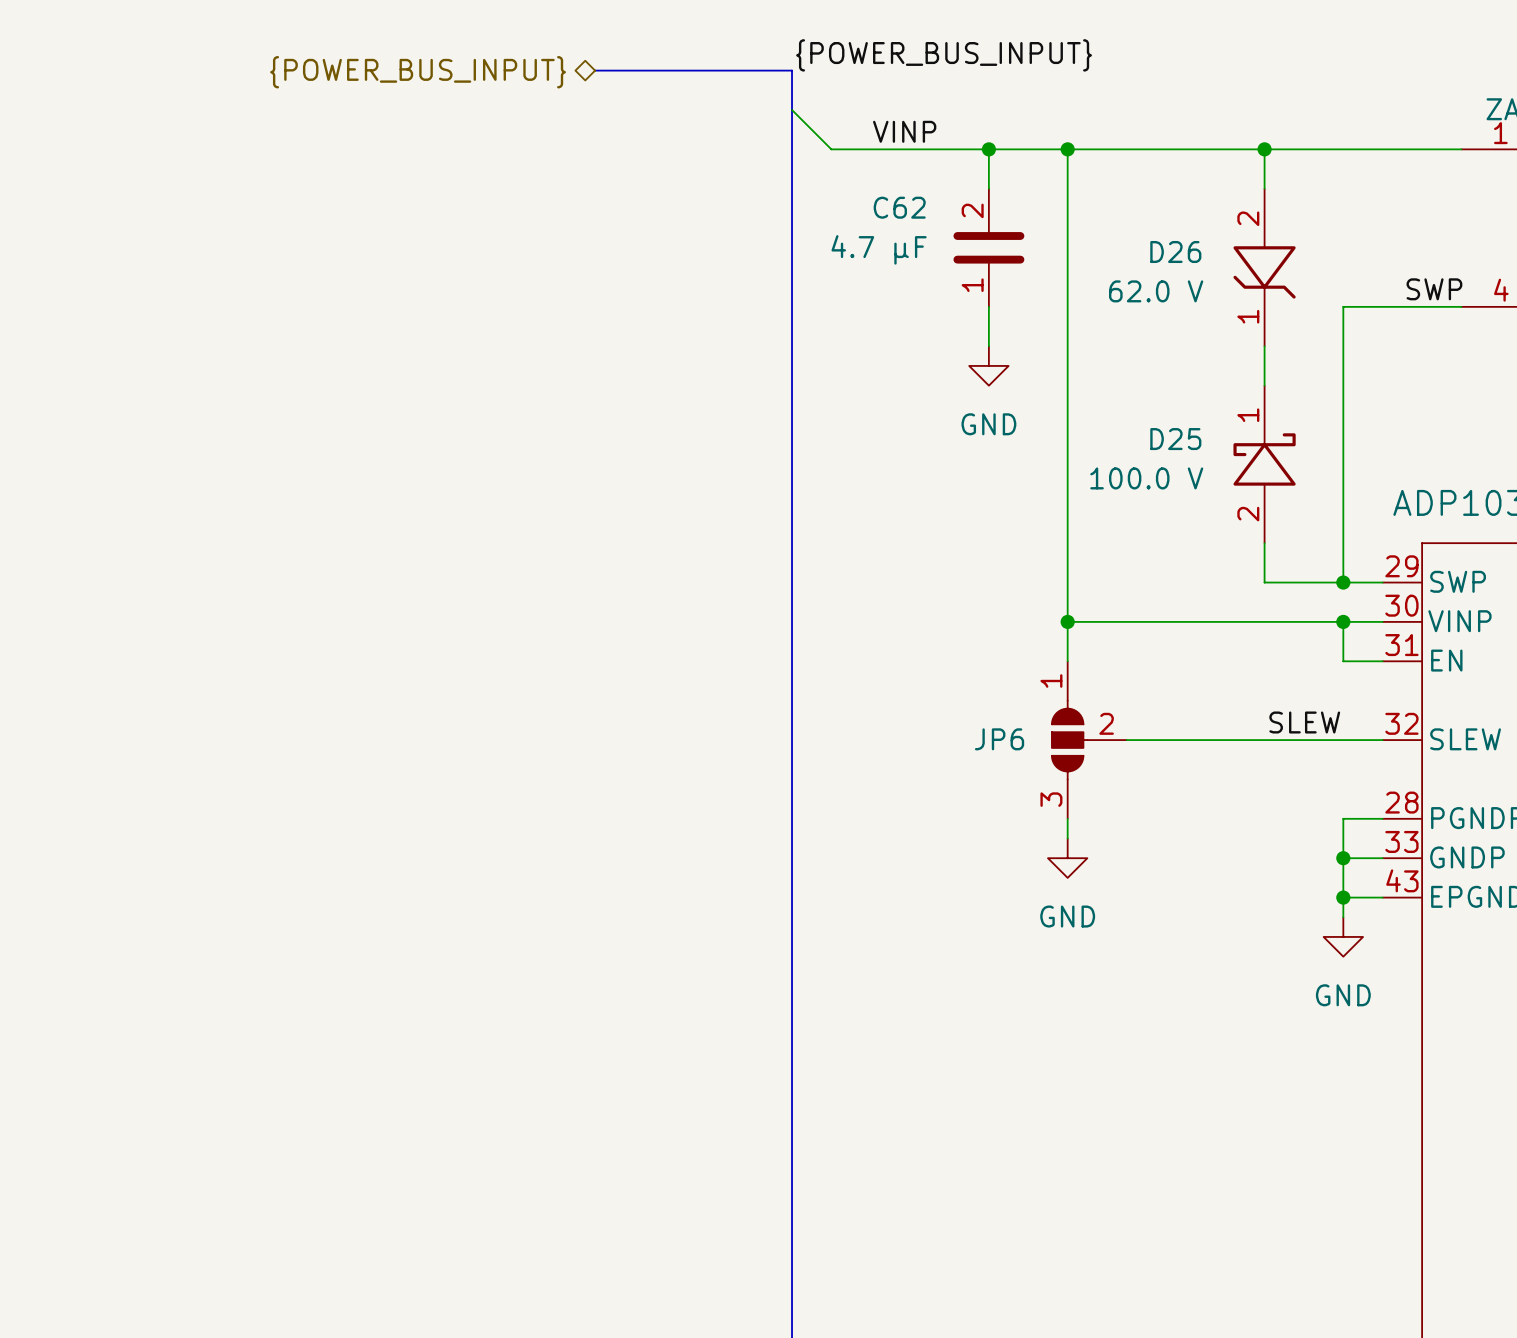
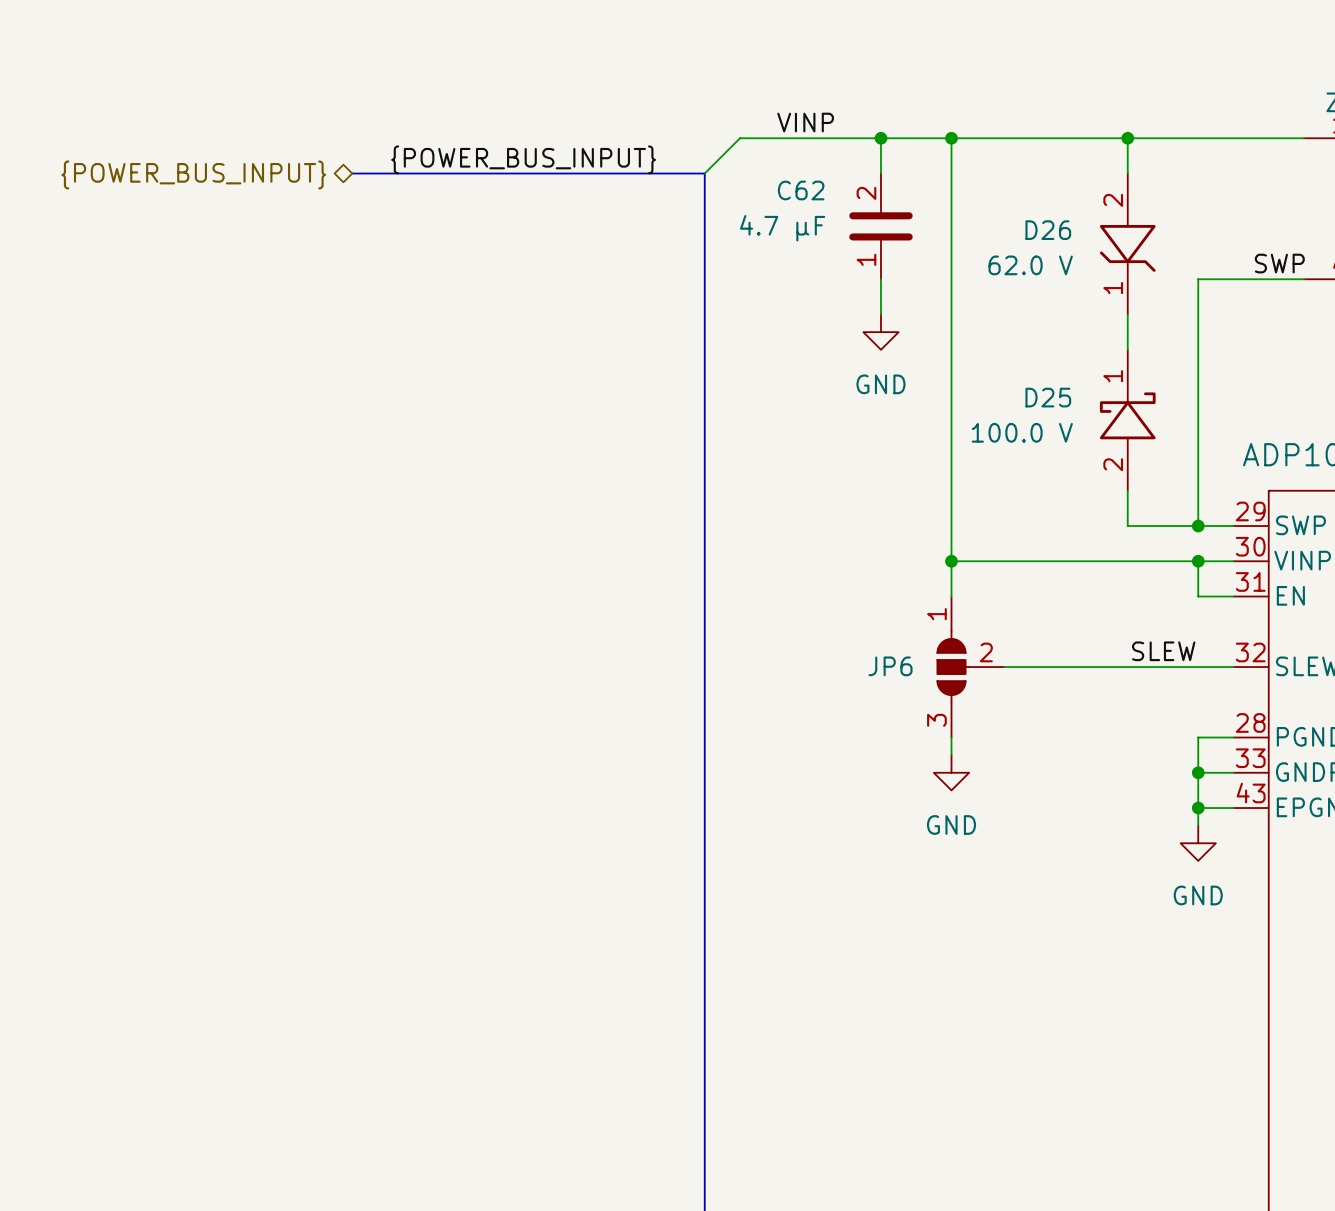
label position: {POWER_BUS_INPUT} (944, 55) -> {POWER_BUS_INPUT} (523, 159)
bus: (595, 70) (792, 70) (792, 188) -> (352, 173) (704, 173)
hierarchical label position: {POWER_BUS_INPUT} (418, 72) -> {POWER_BUS_INPUT} (193, 174)
wire: (792, 109) (831, 149) -> (704, 173) (740, 138)

